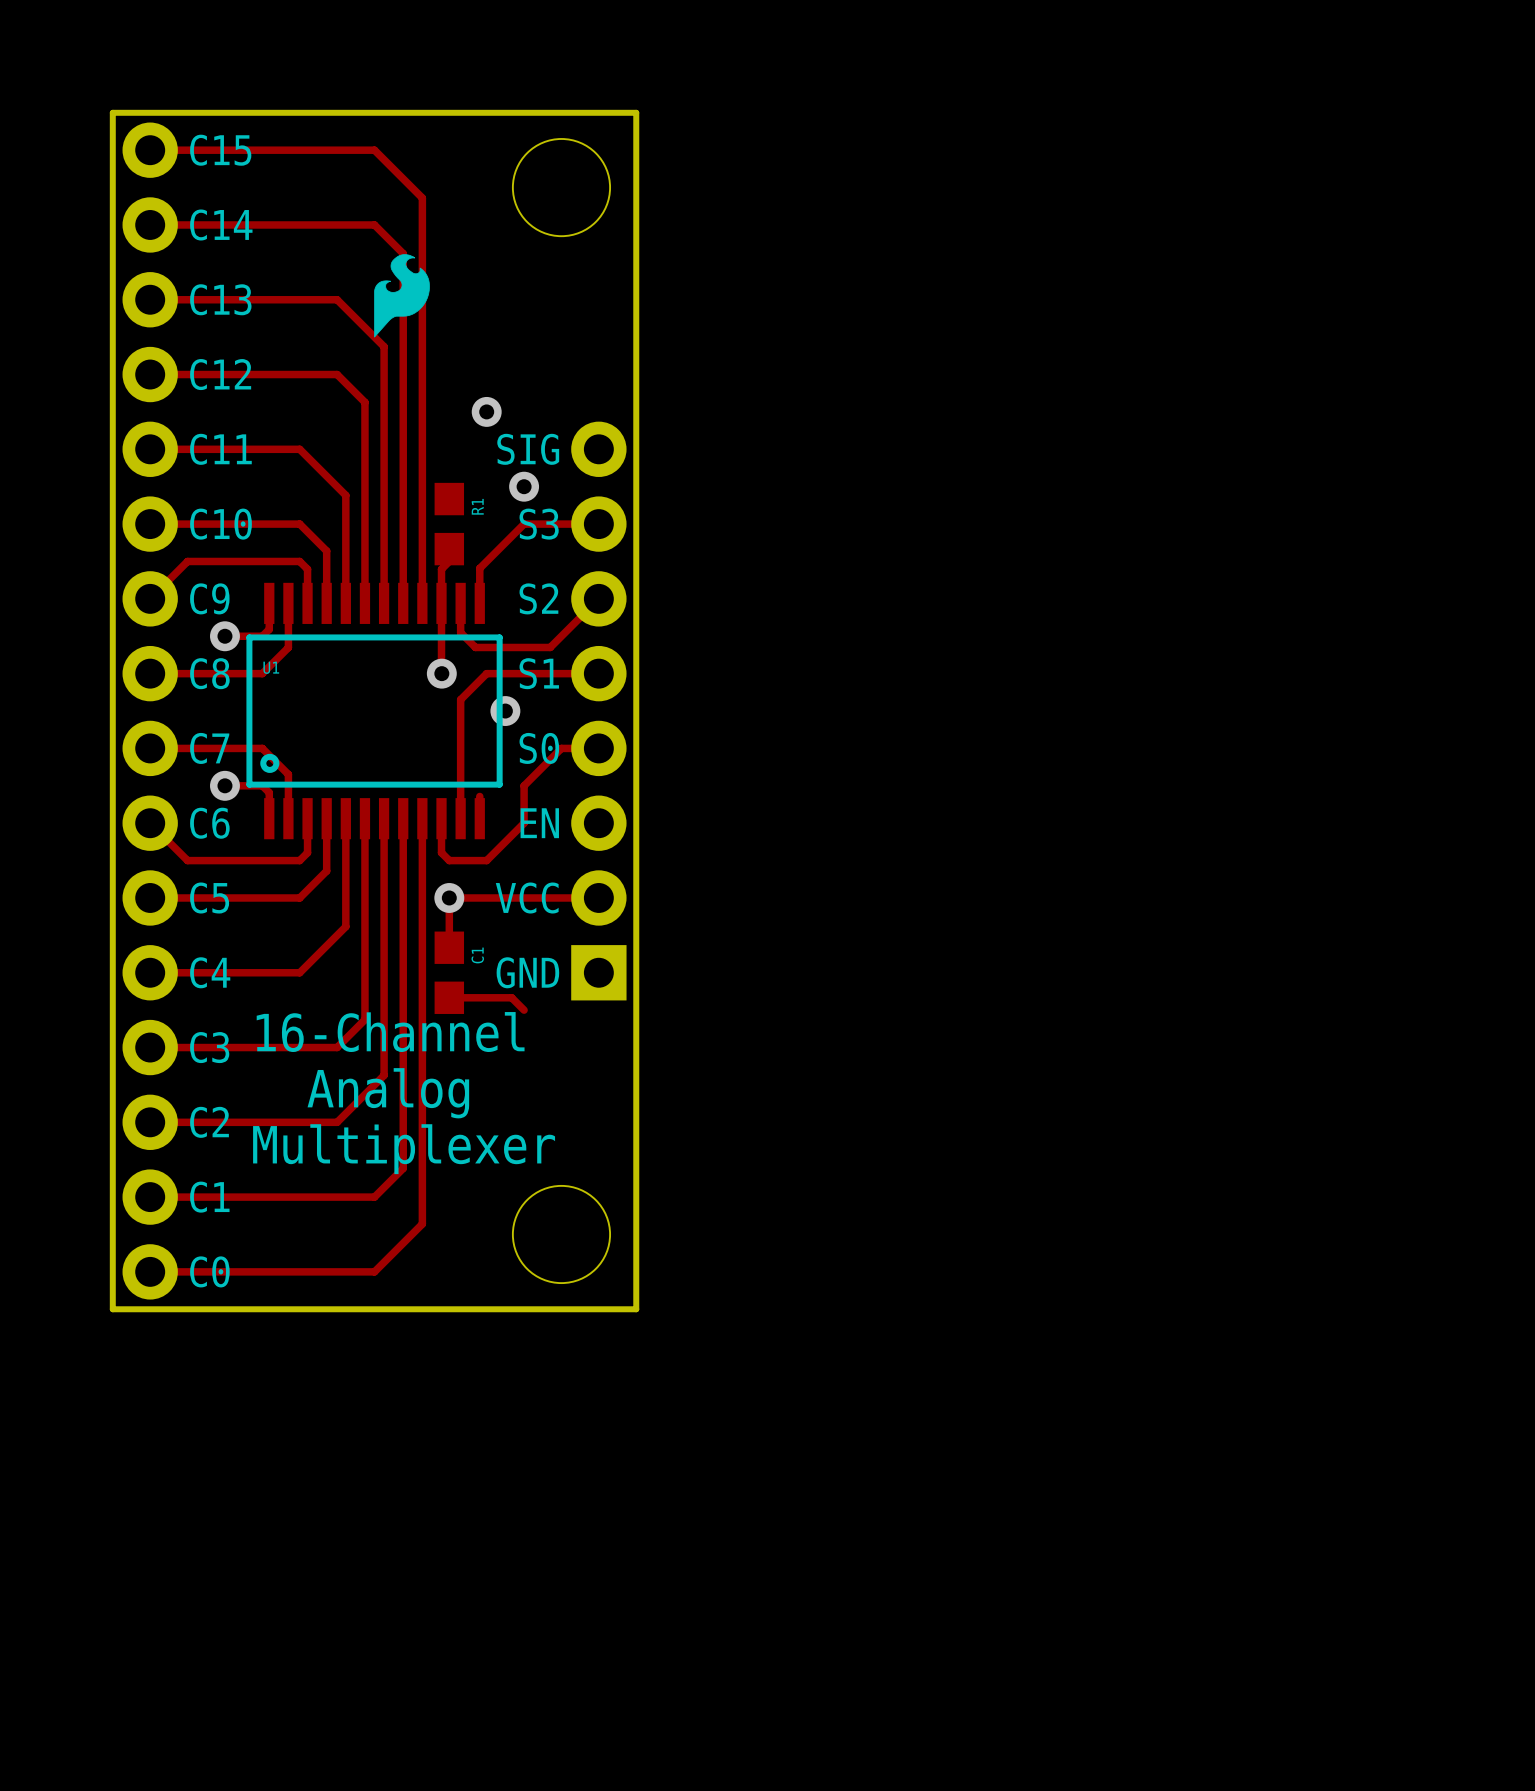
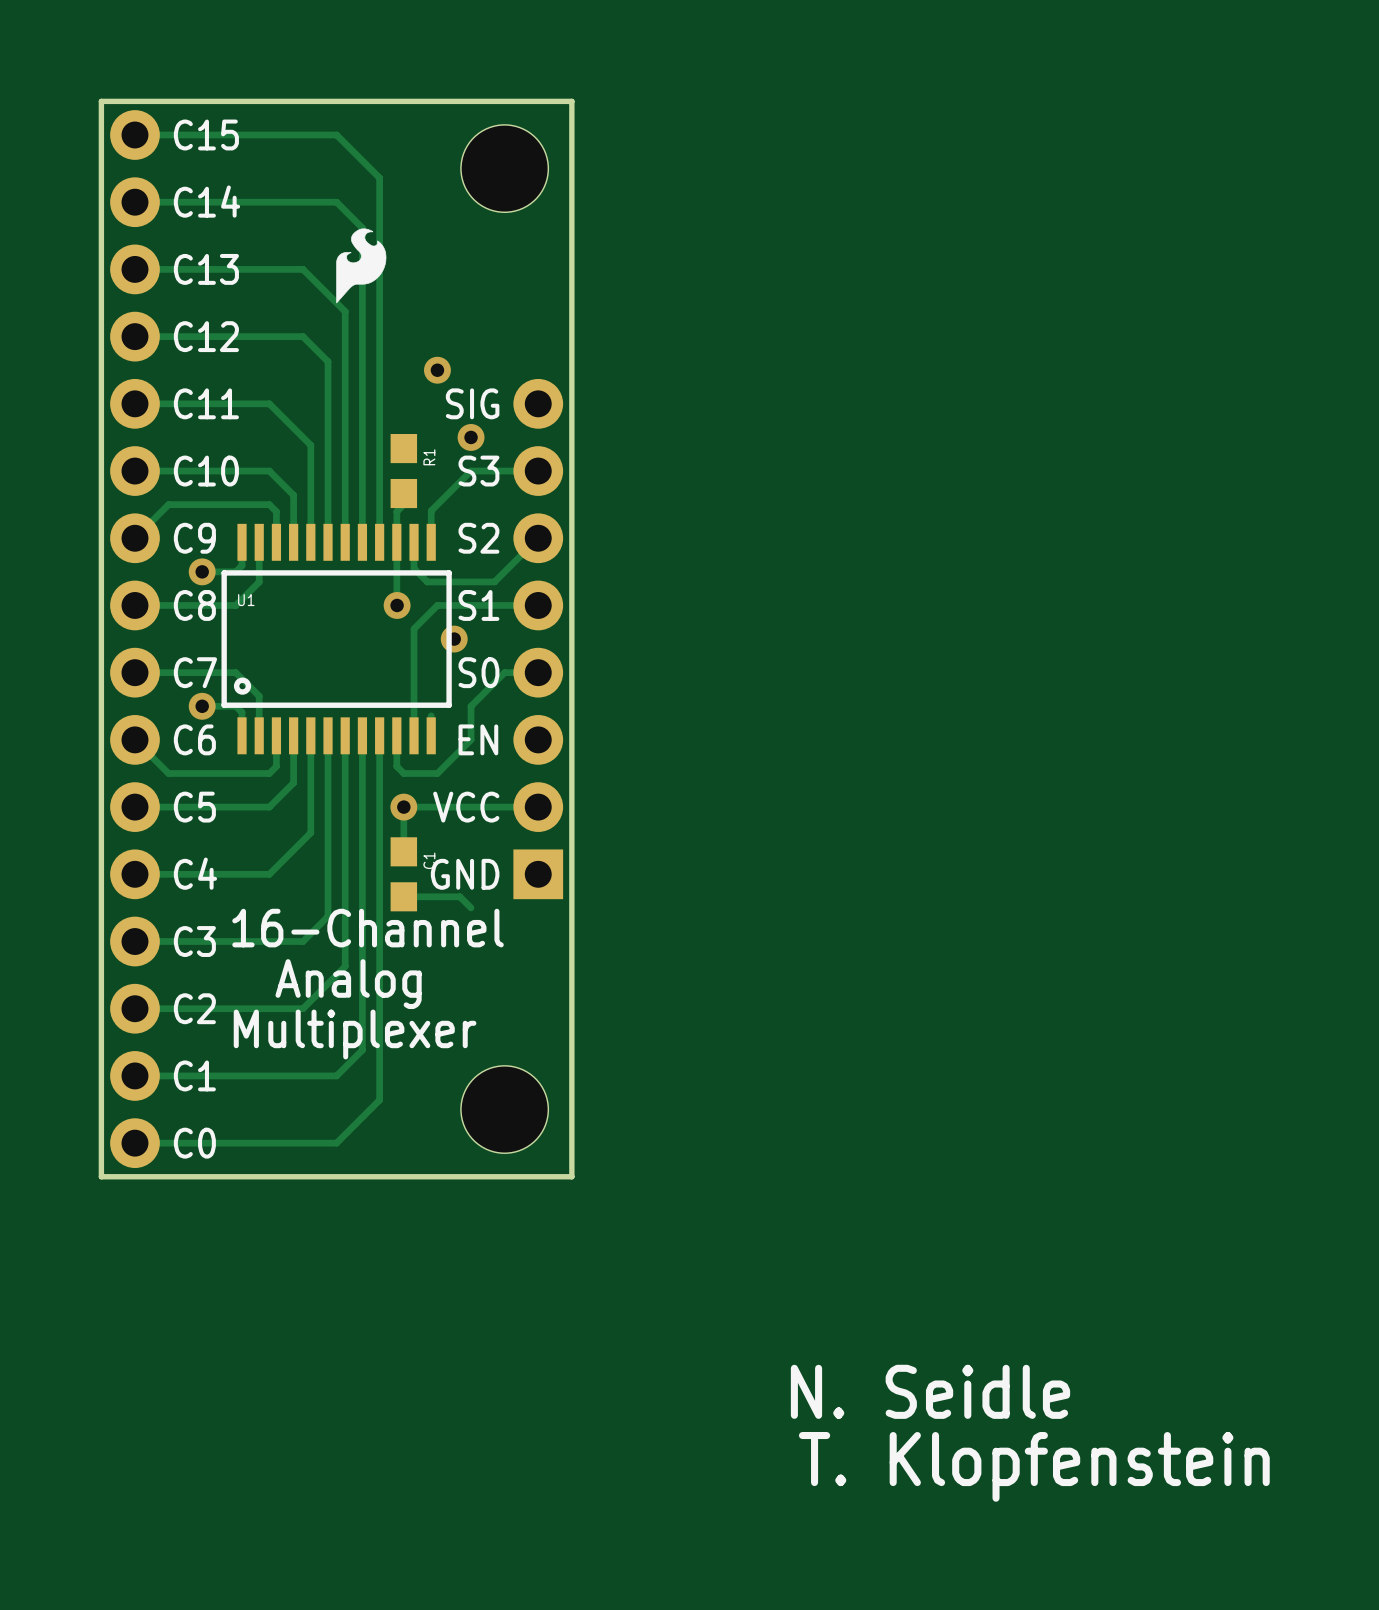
text: none -> N. Seidle (930, 1391)
text: none -> T. Klopfenstein (1034, 1466)

